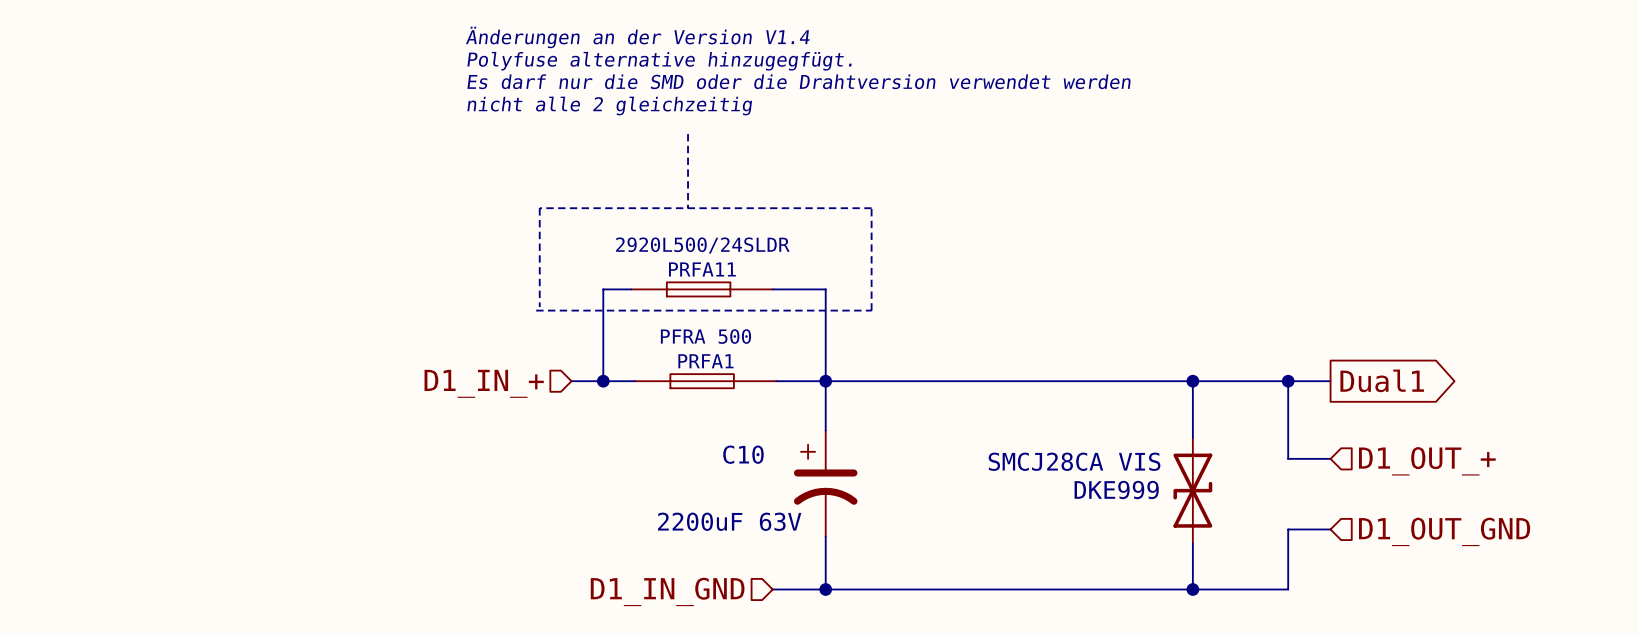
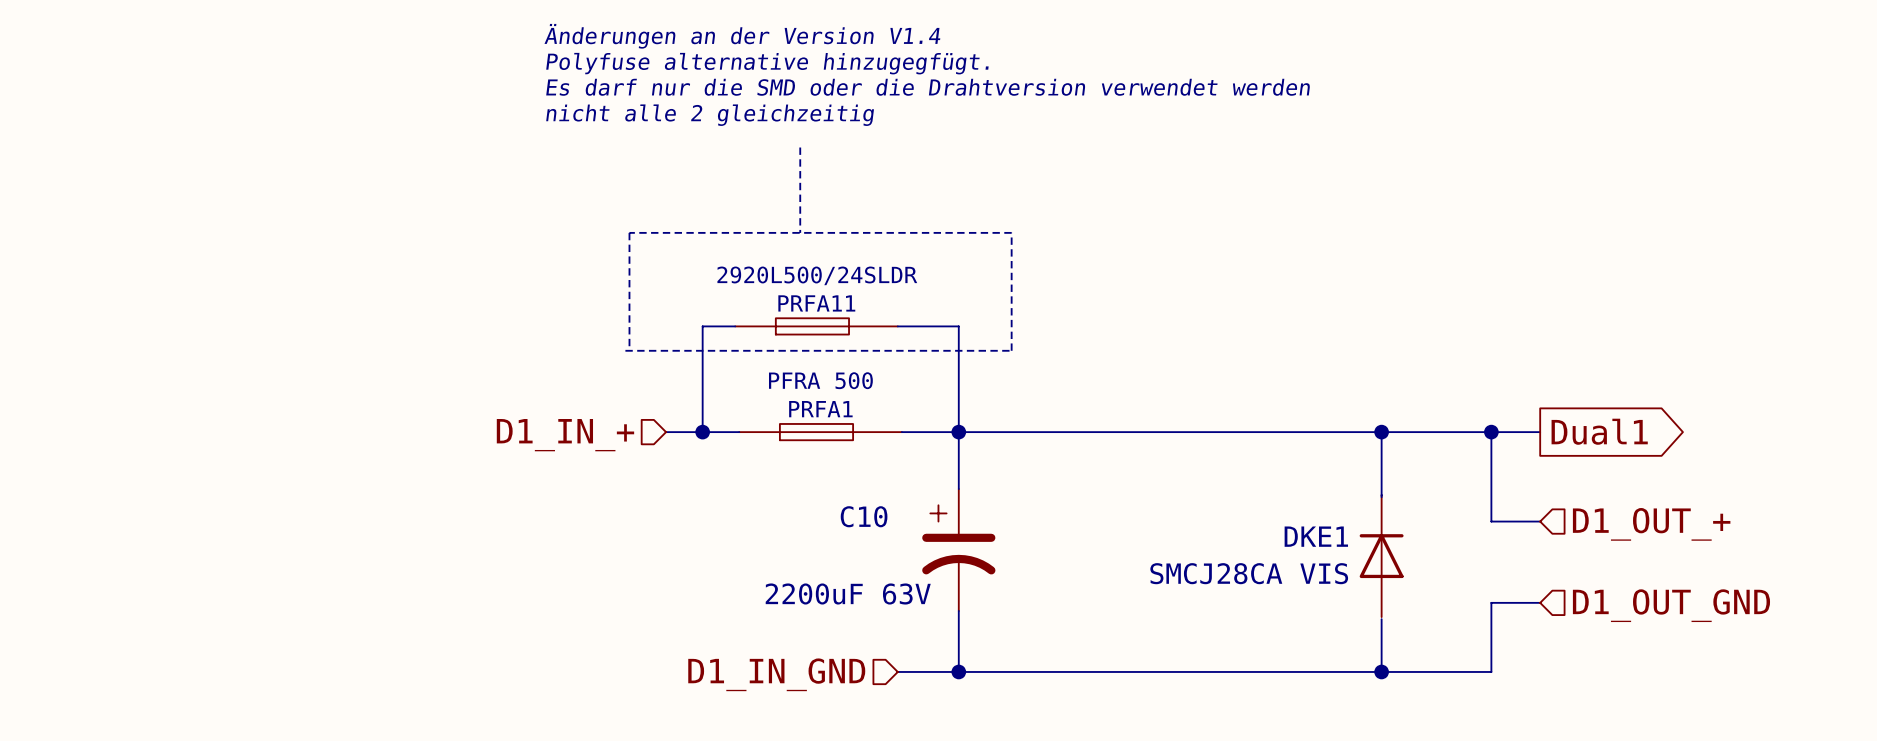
DKE1: none -> SMCJ28CA VIS (1381, 556)
DKE999: SMCJ28CA VIS (1192, 490) -> none

